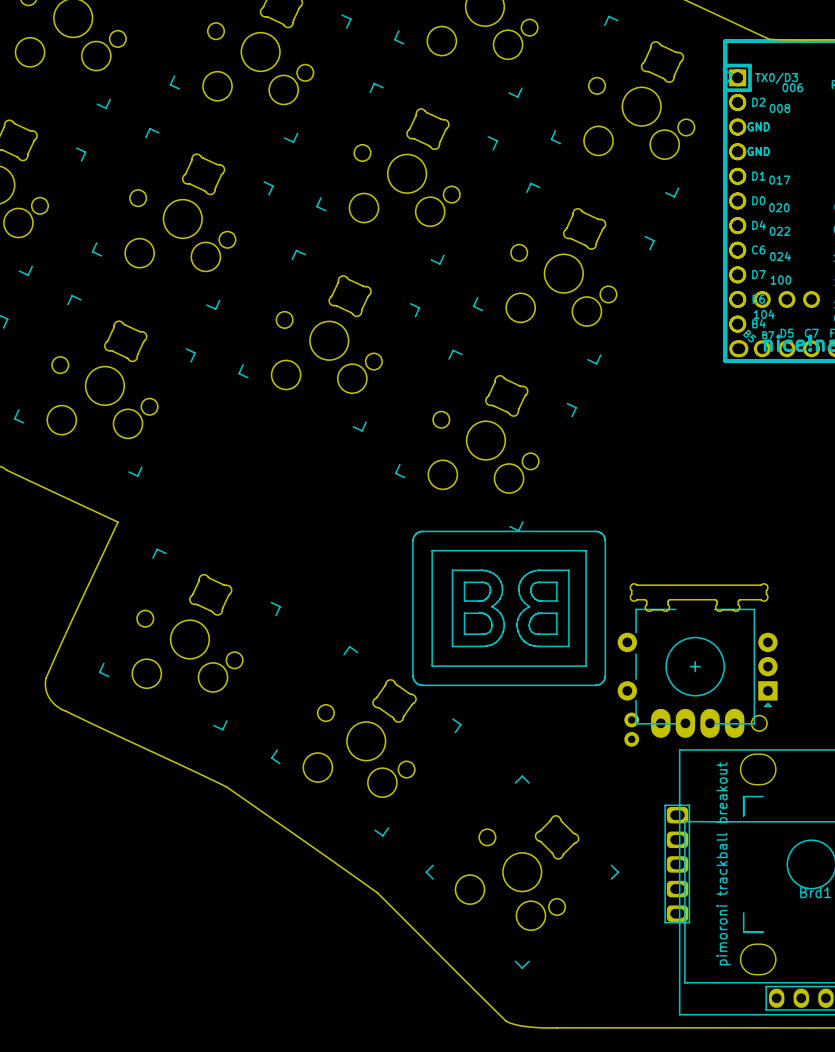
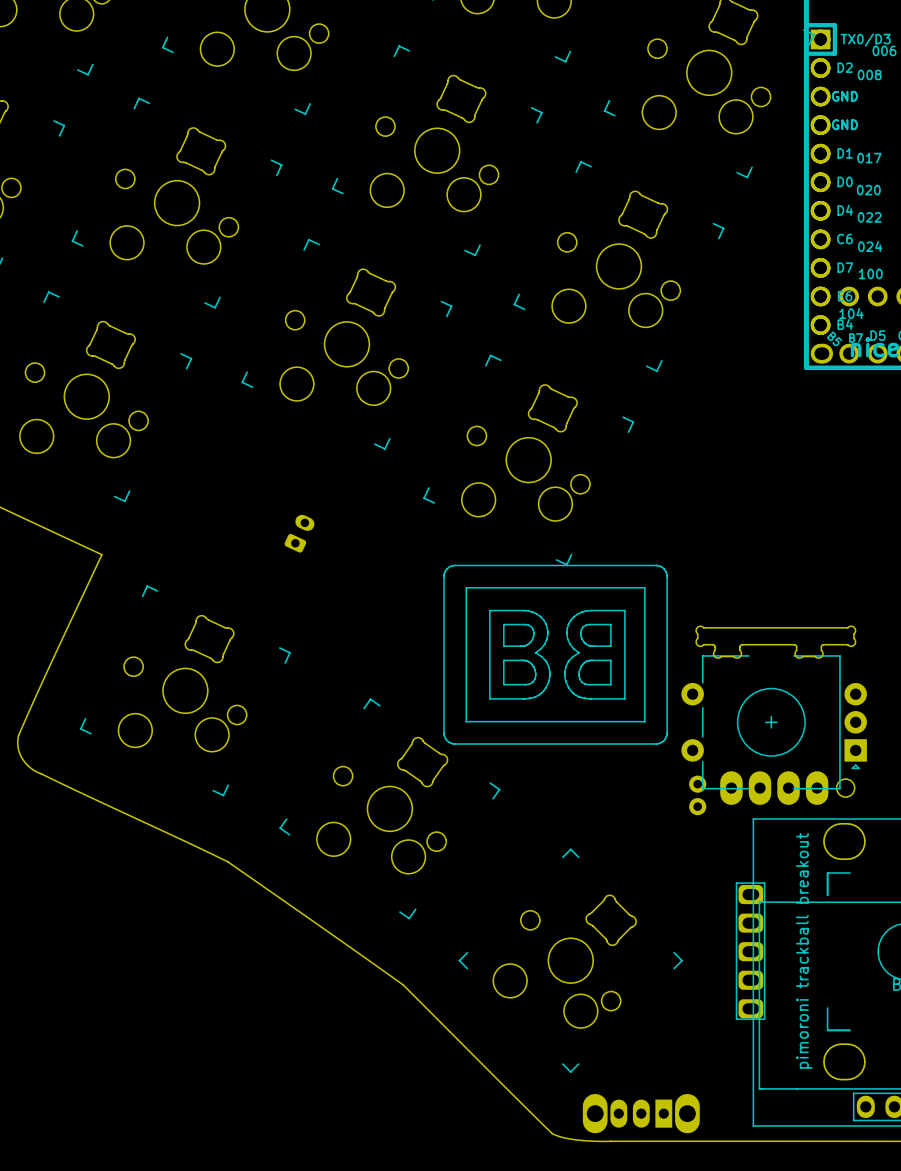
part: none -> (299, 533)
part: none -> (641, 1113)

